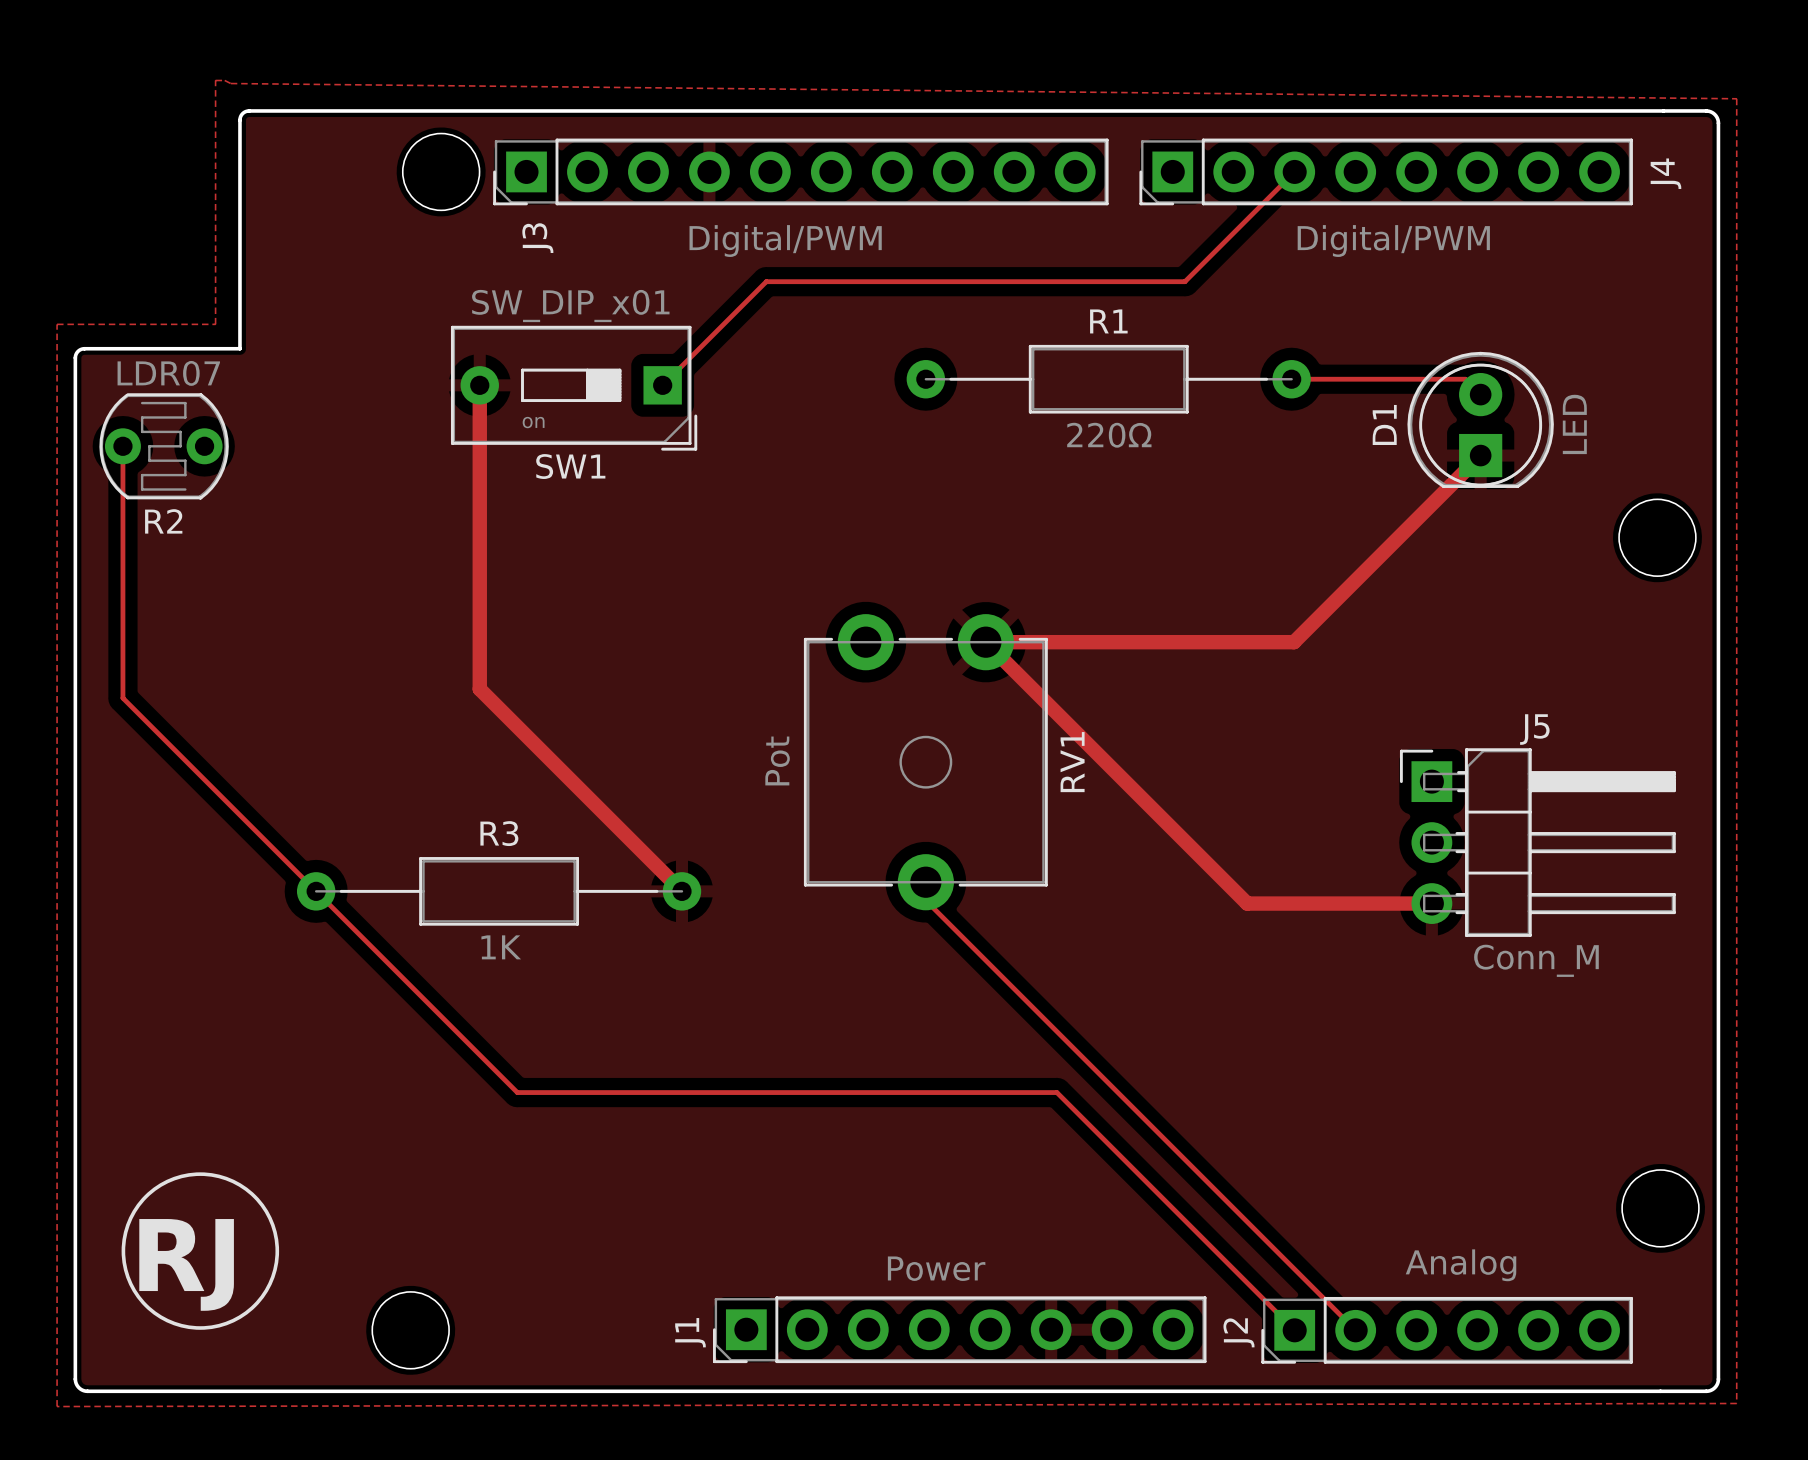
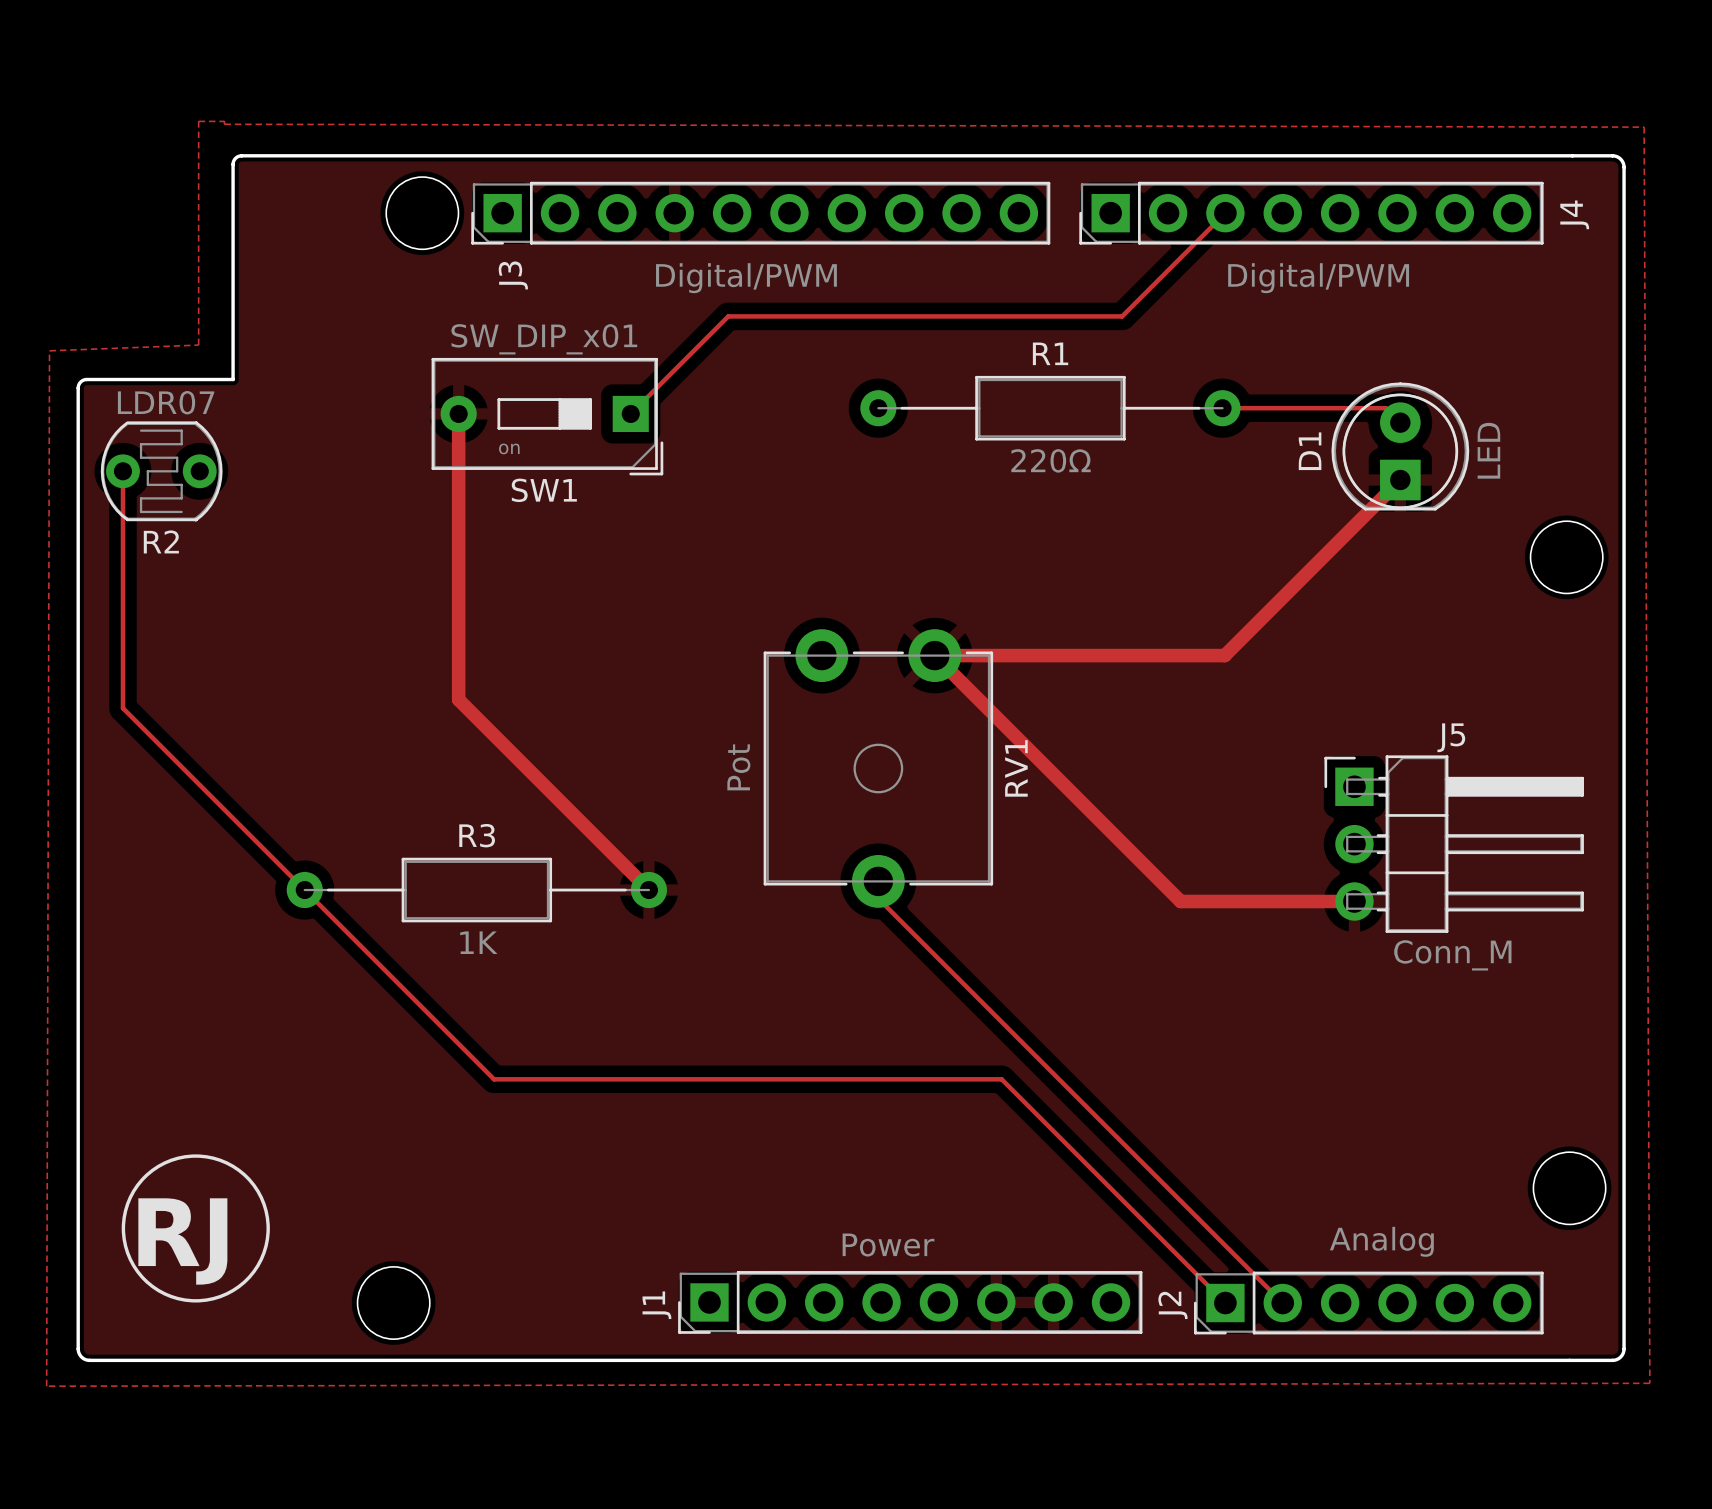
zone outline: (215, 80) (215, 324) (57, 324) (57, 1406) (1736, 1403) (1736, 98) (230, 83) (224, 80) (215, 80) -> (198, 121) (198, 345) (49, 350) (46, 1386) (1649, 1383) (1644, 127) (224, 124) (224, 121) (198, 121)

